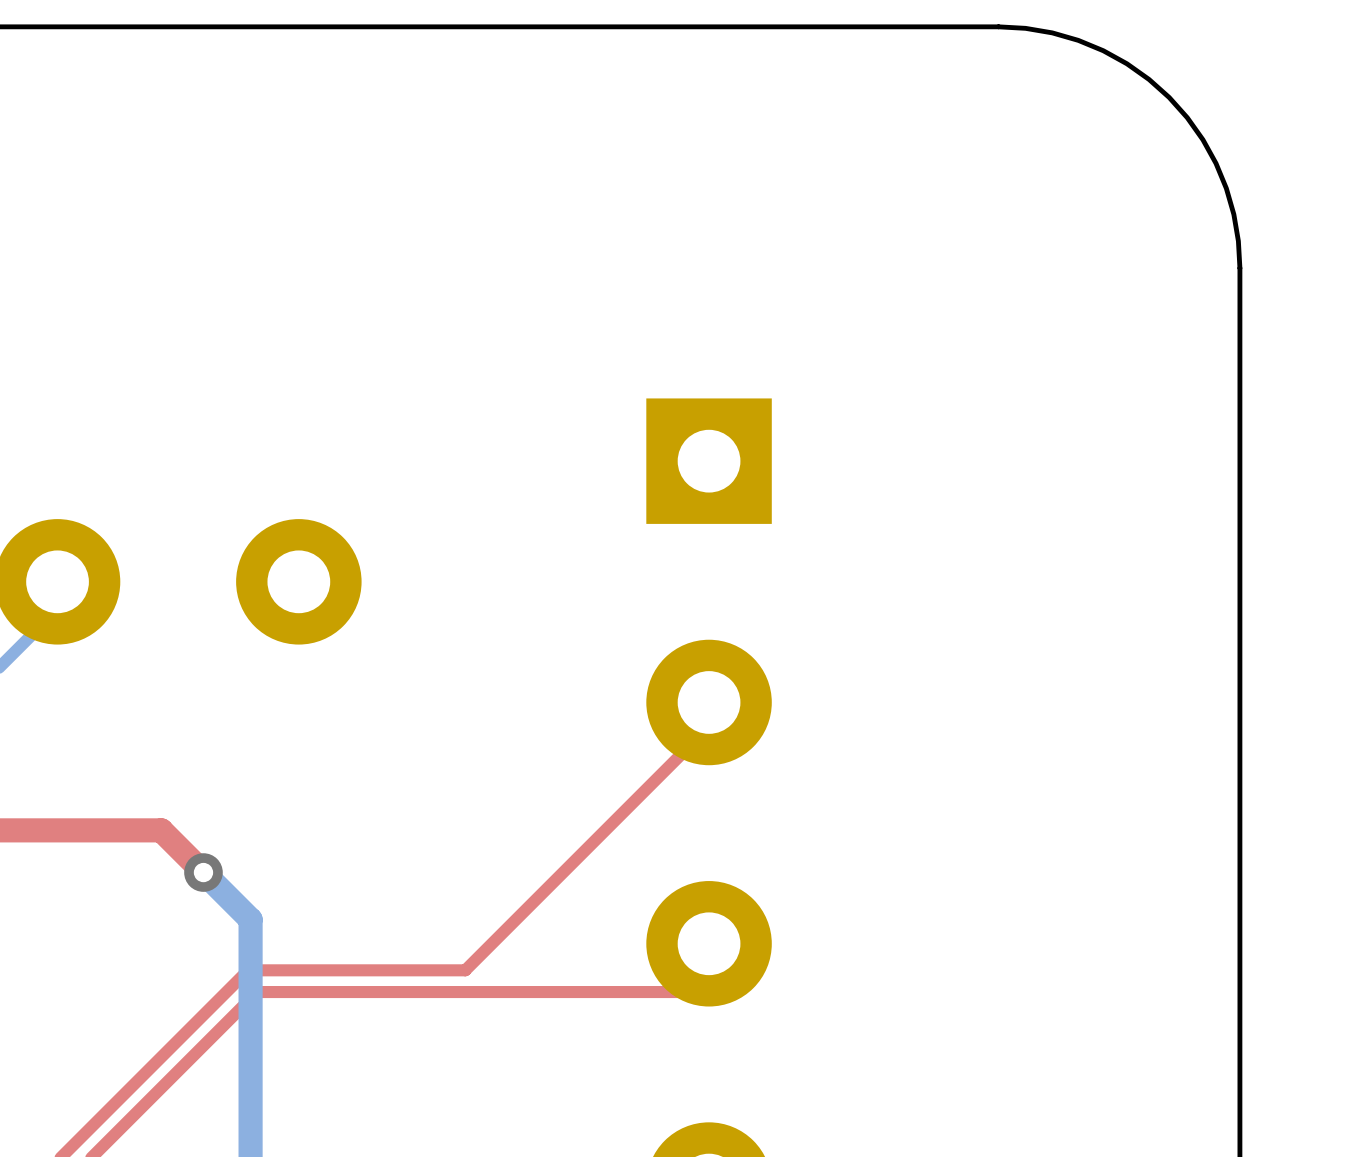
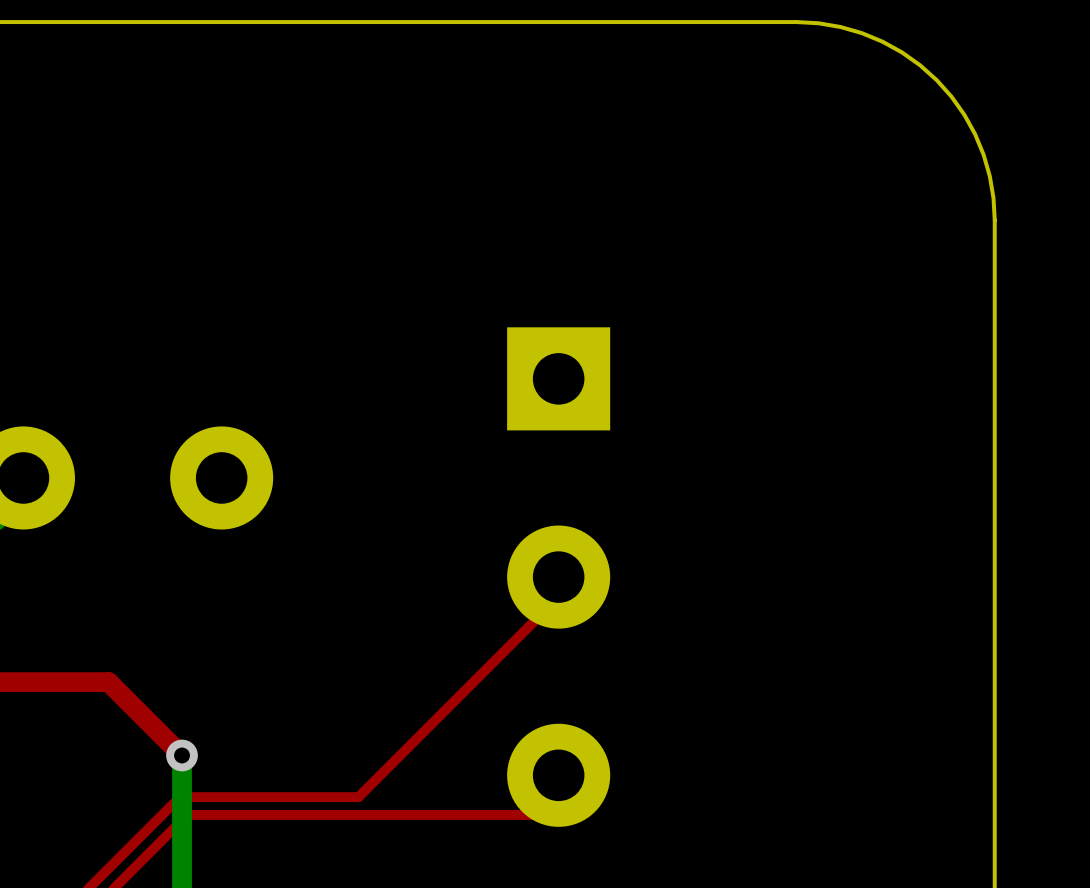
top track: none -> (143, 716) (182, 755)
bottom track: (203, 872) (250, 919) -> none
via position: (203, 872) -> (182, 755)

